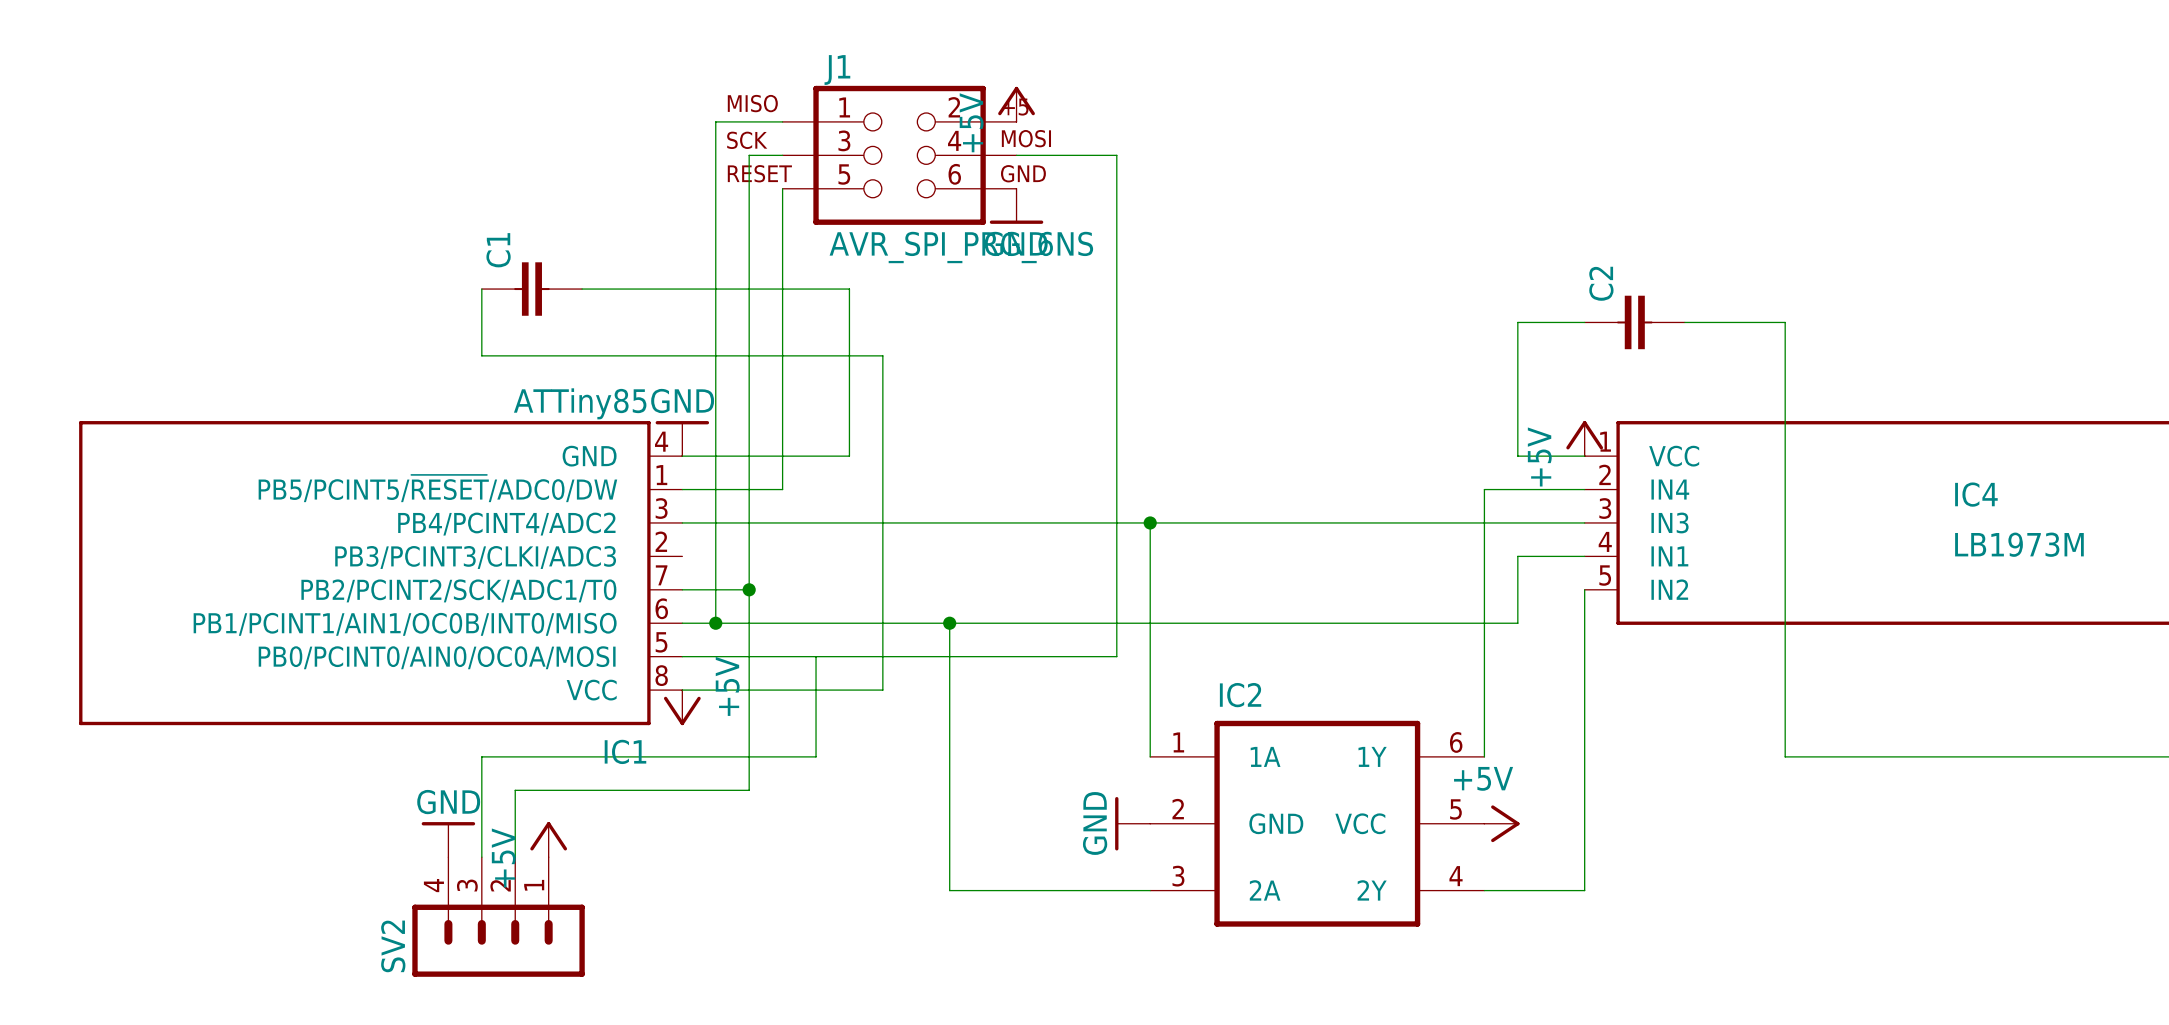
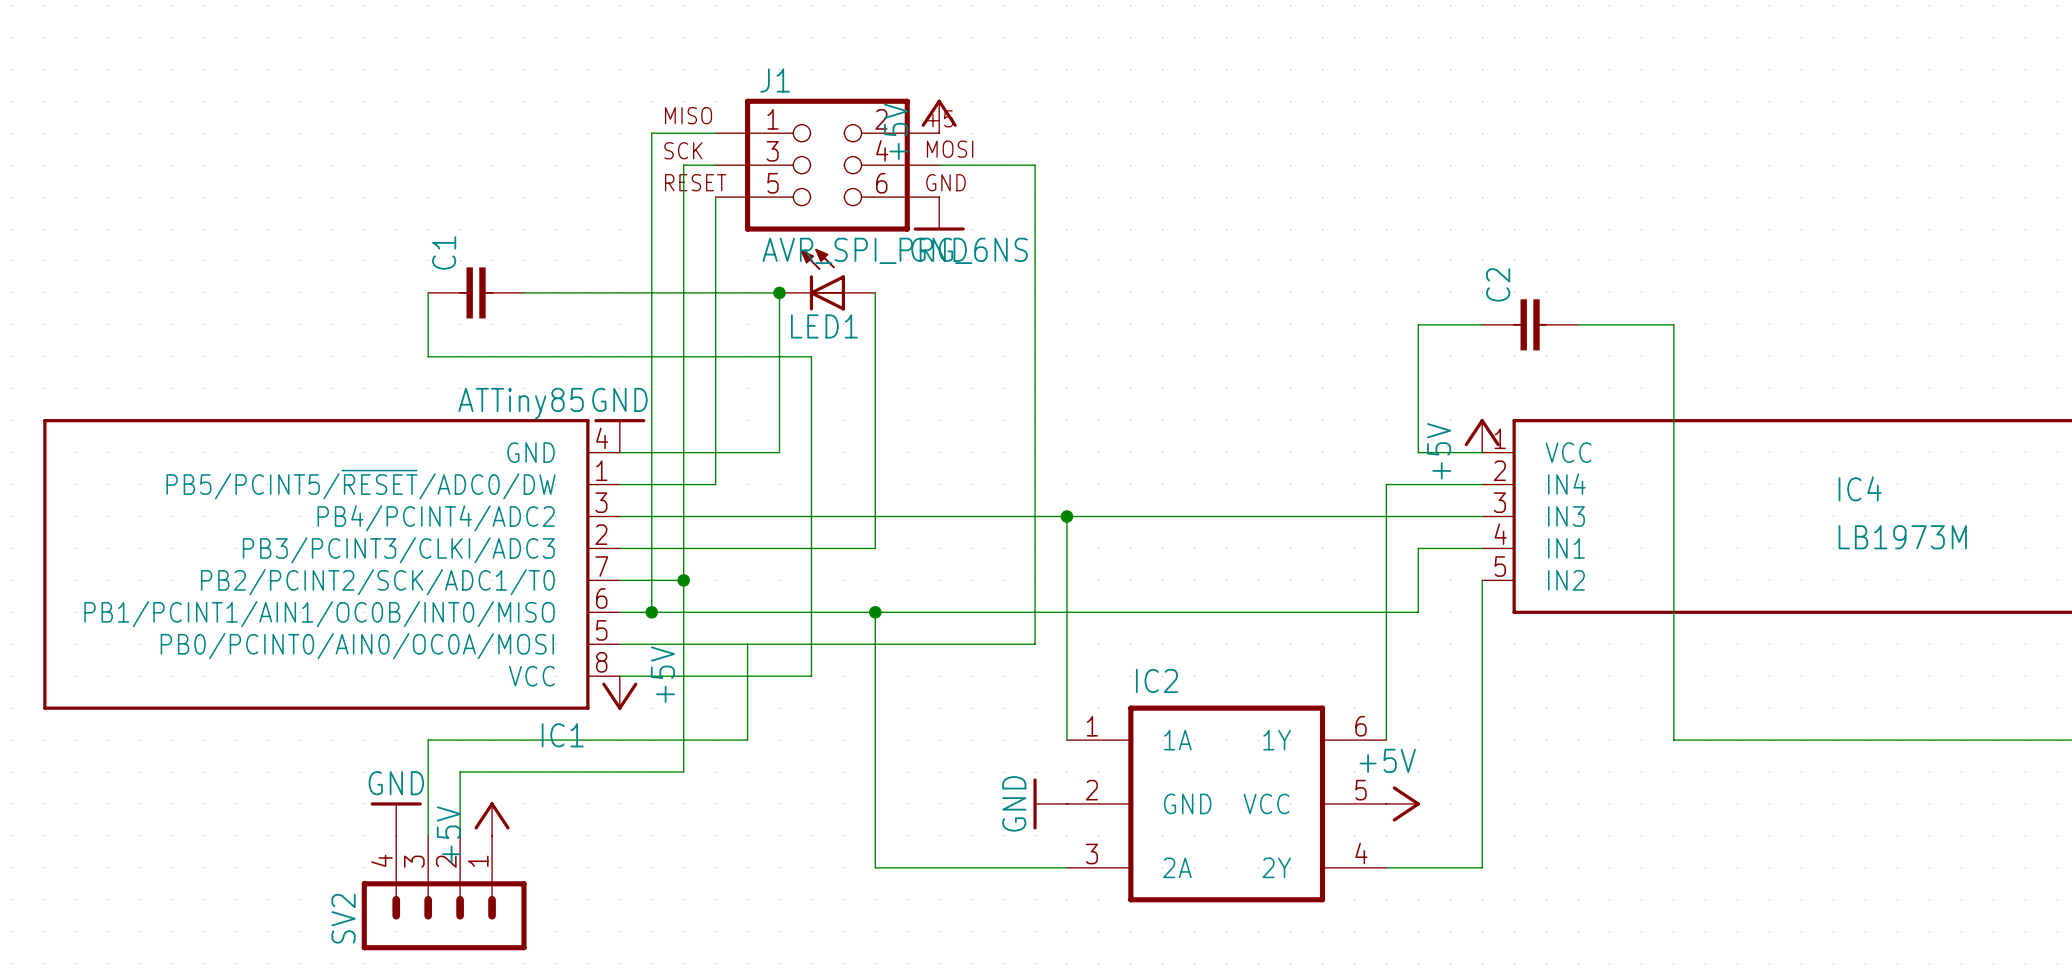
LED1: none -> (827, 279)
junction: none -> (779, 292)
wire: none -> (875, 292) (875, 548) (619, 548)

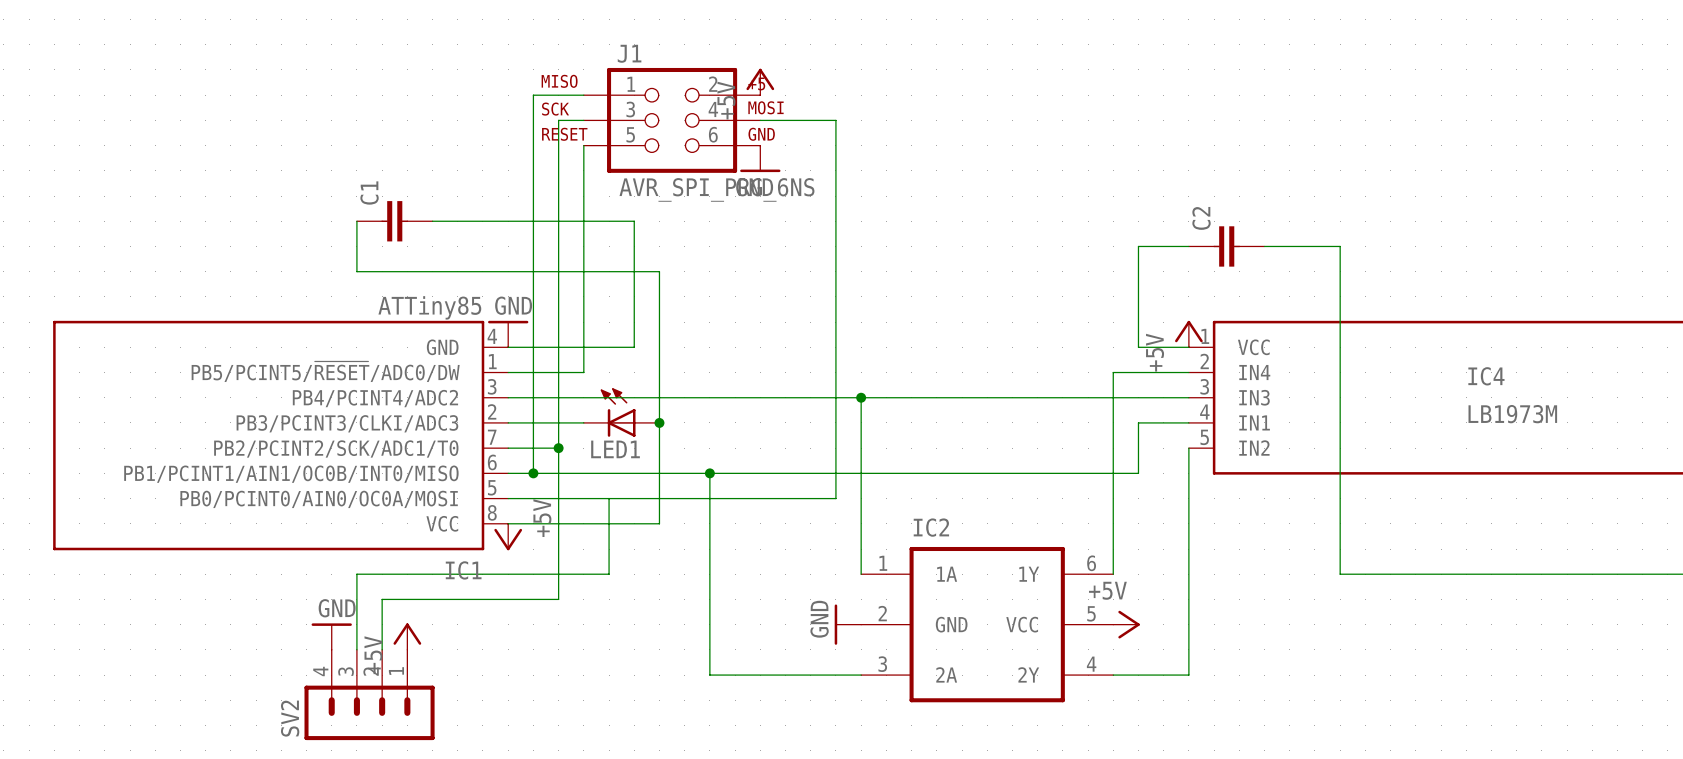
LED1 position: (827, 279) -> (621, 412)
junction: (779, 292) -> none
wire: (875, 292) (875, 548) (715, 548) -> none
junction: none -> (659, 422)

